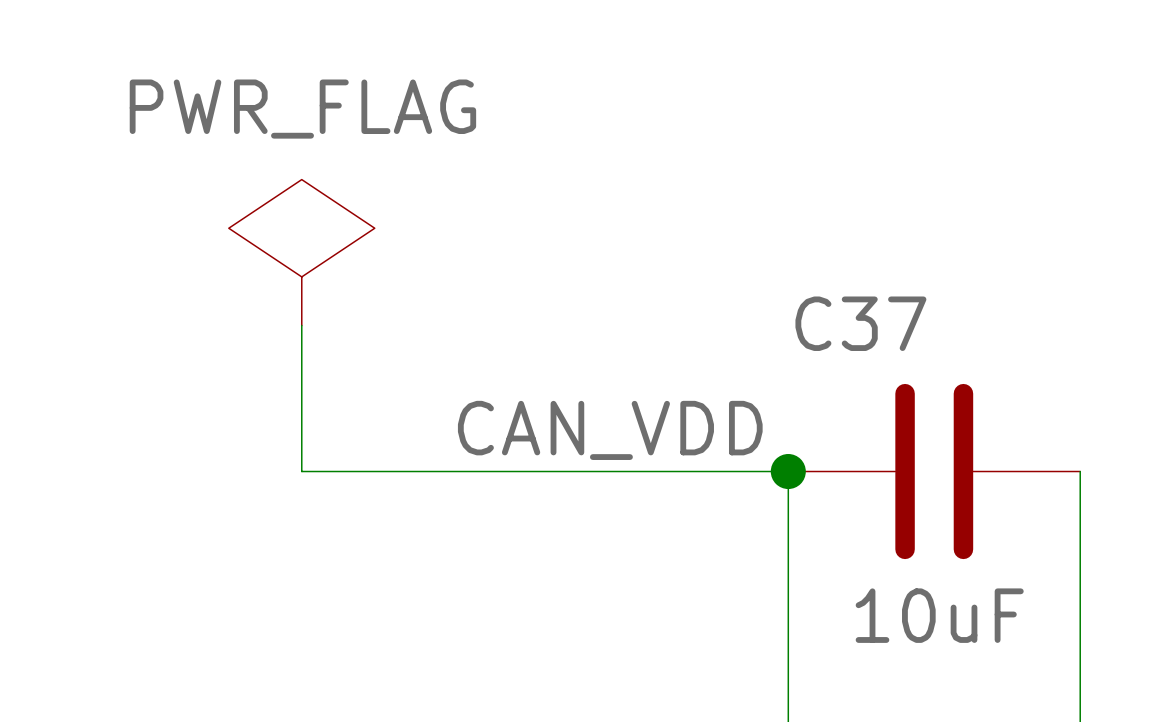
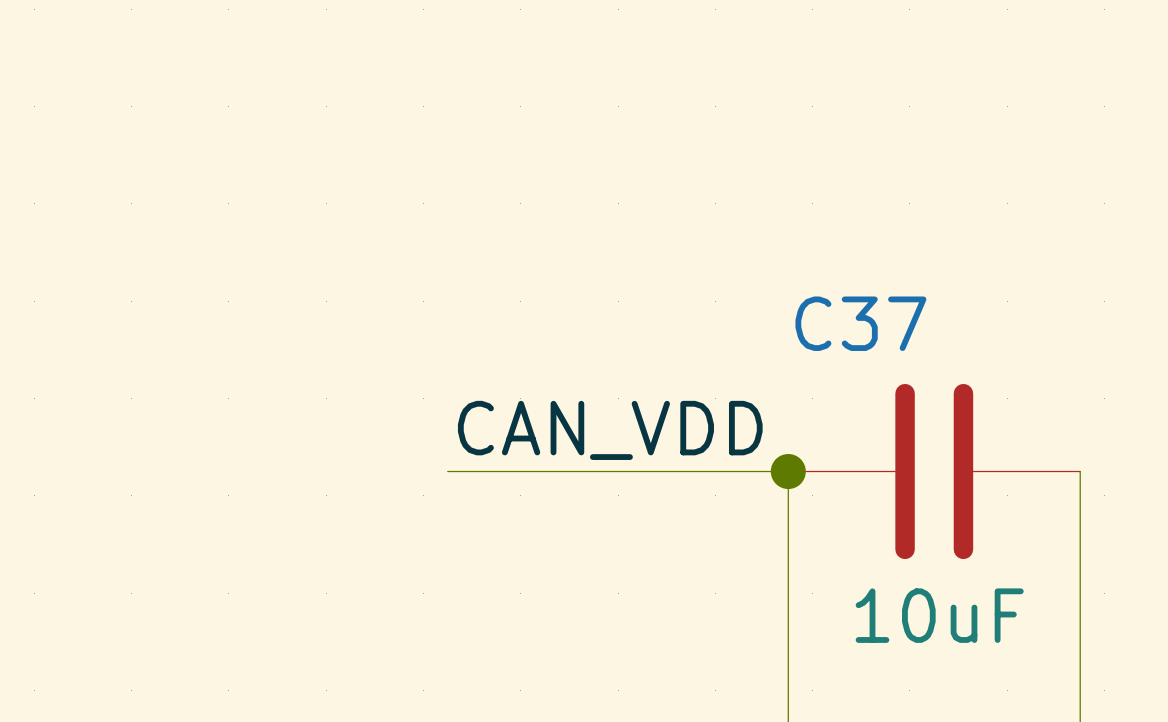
power symbol: PWR_FLAG (301, 252) -> none
wire: (301, 325) (301, 471) (447, 471) -> none

